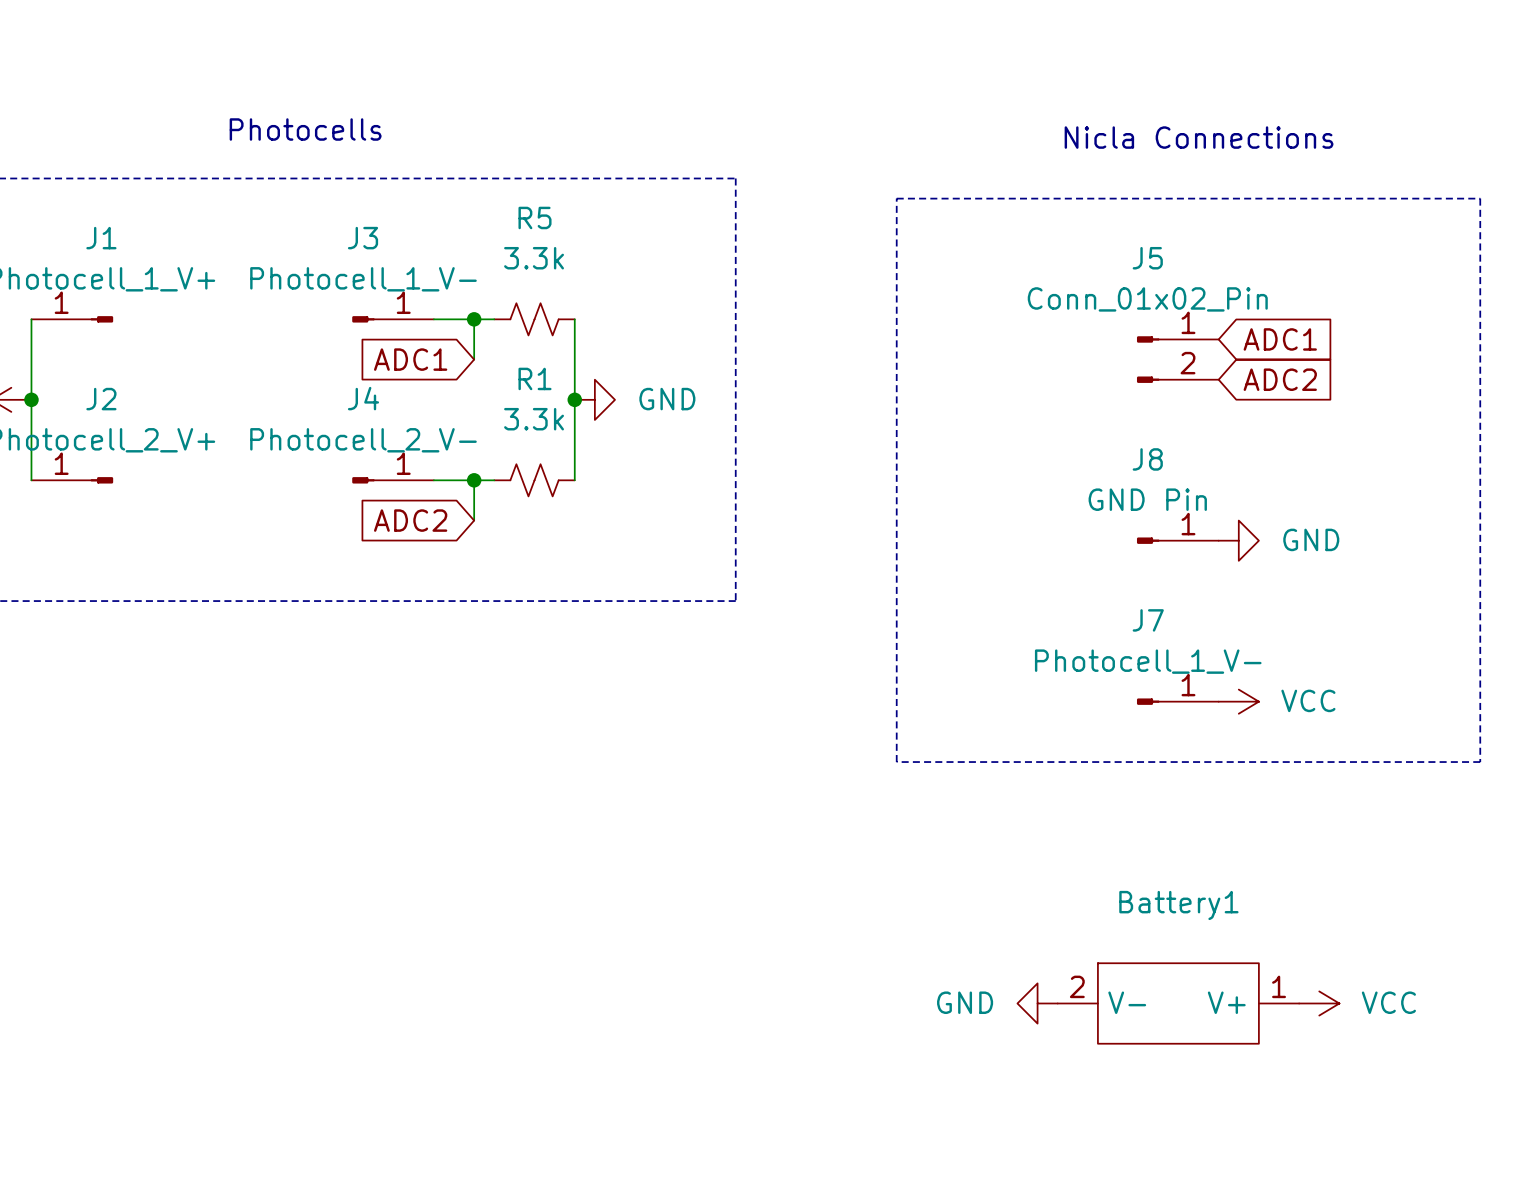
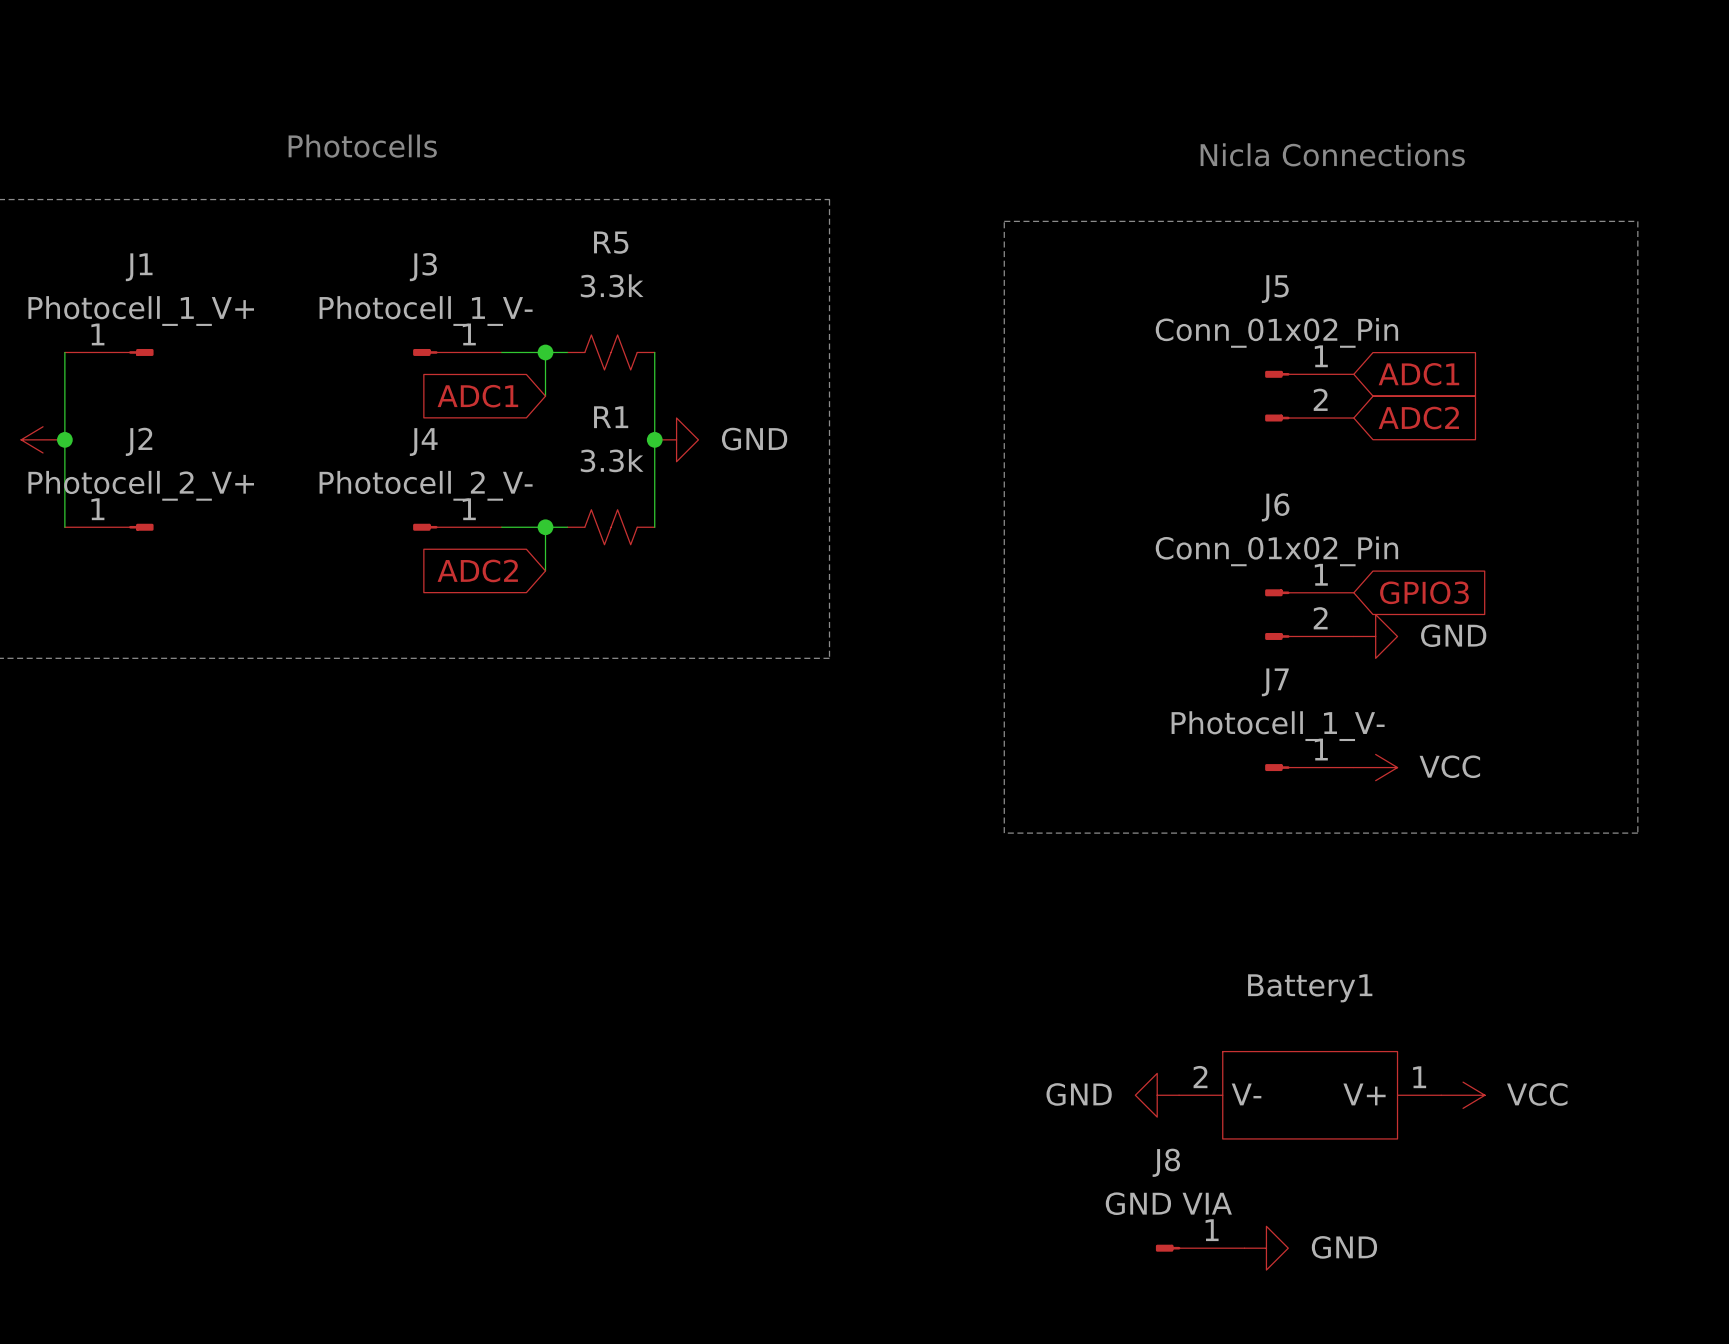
J8 value: GND Pin (1147, 499) -> GND VIA (1168, 1203)
J8 position: (1177, 540) -> (1200, 1248)
power symbol position: GND (1238, 540) -> GND (1375, 636)
global label: none -> GPIO3 (1424, 592)
J6: none -> Conn_01x02_Pin (1309, 614)
power symbol: none -> GND (1266, 1248)

